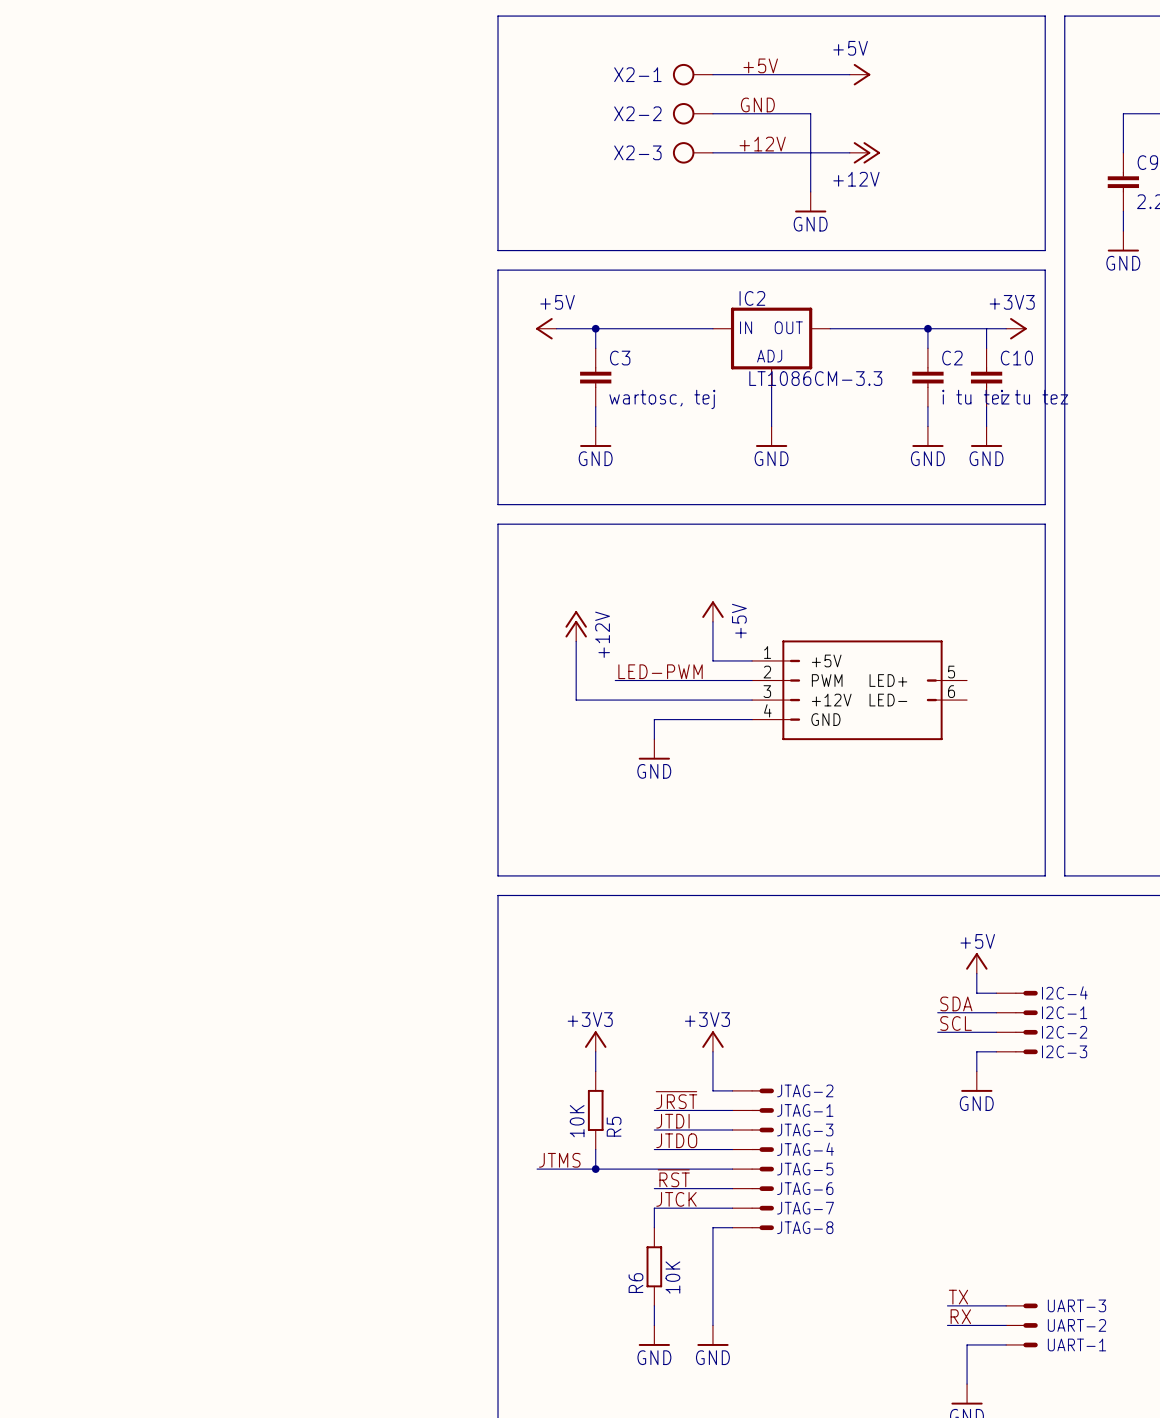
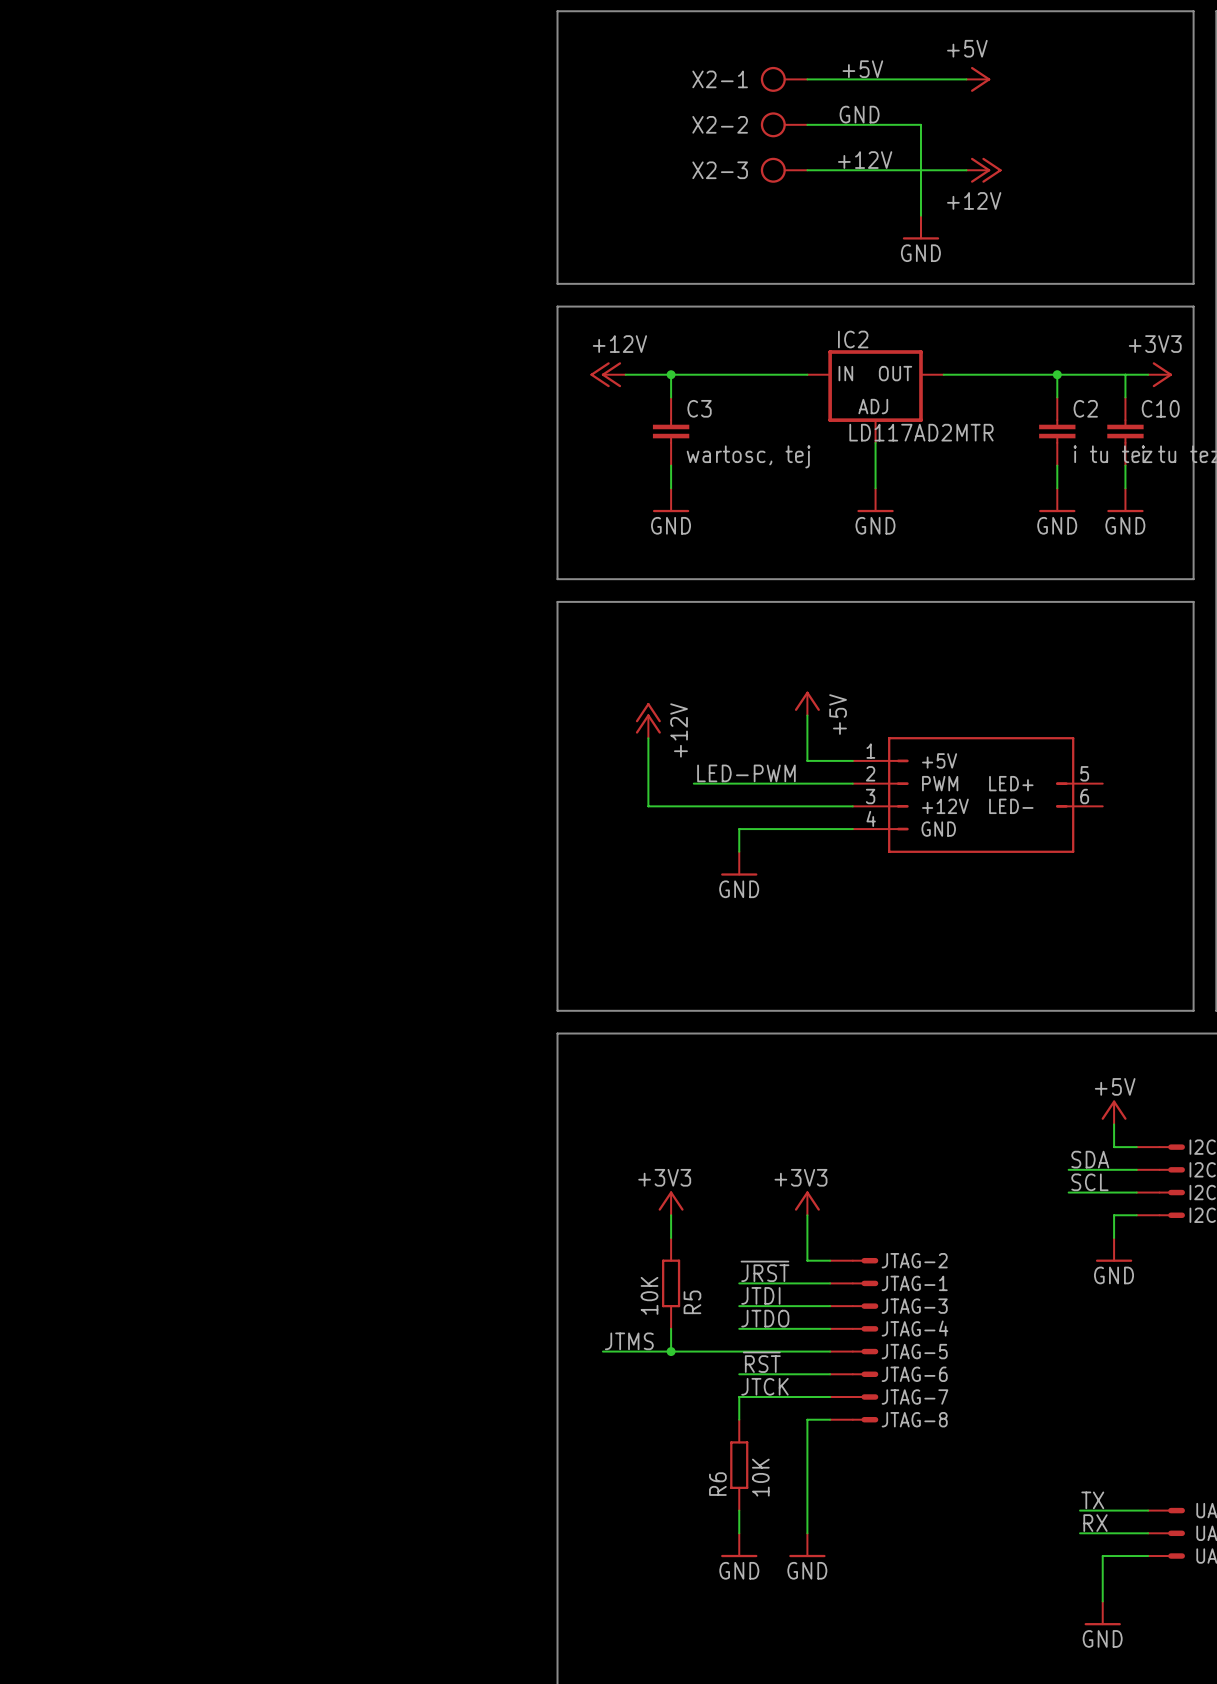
power symbol: +5V (546, 328) -> +12V (608, 374)
IC2 value: LT1086CM-3.3 (815, 378) -> LD117AD2MTR (921, 432)

